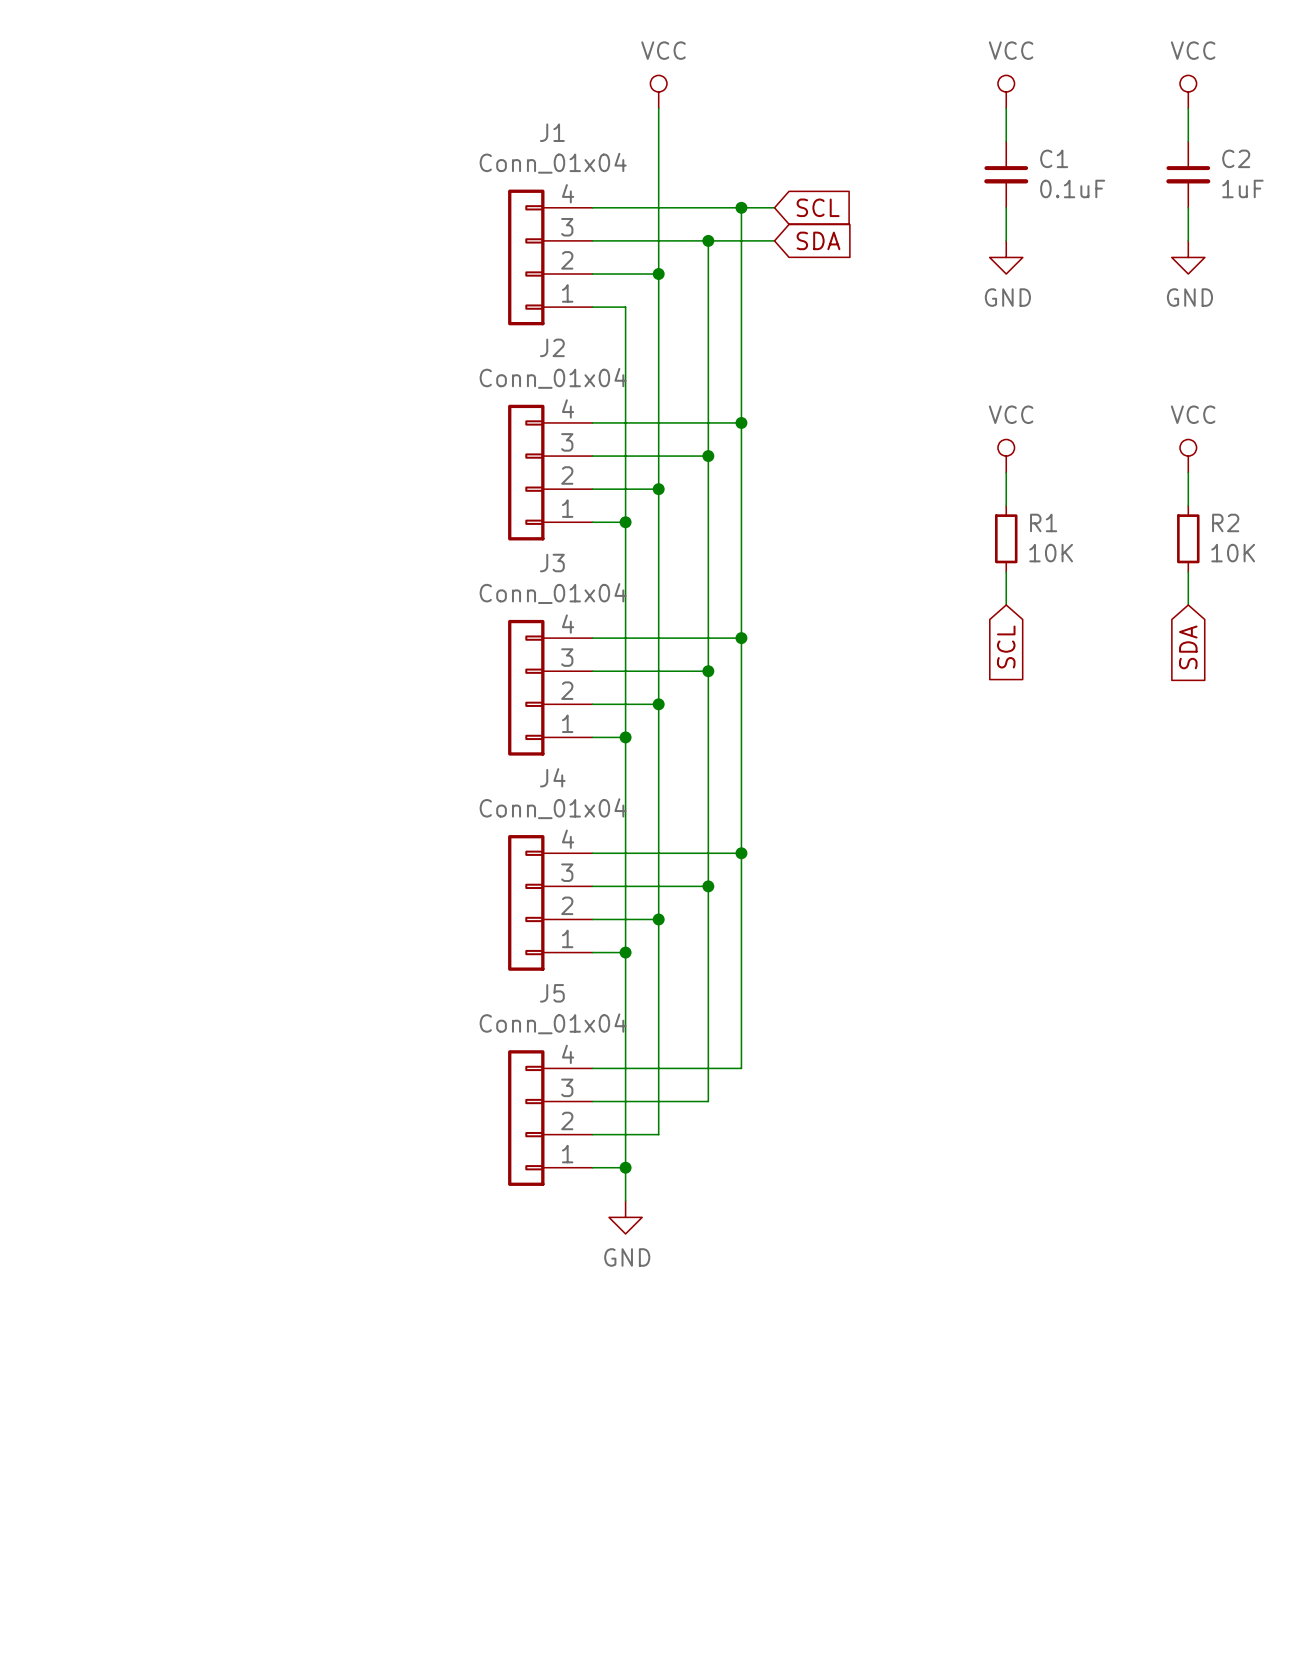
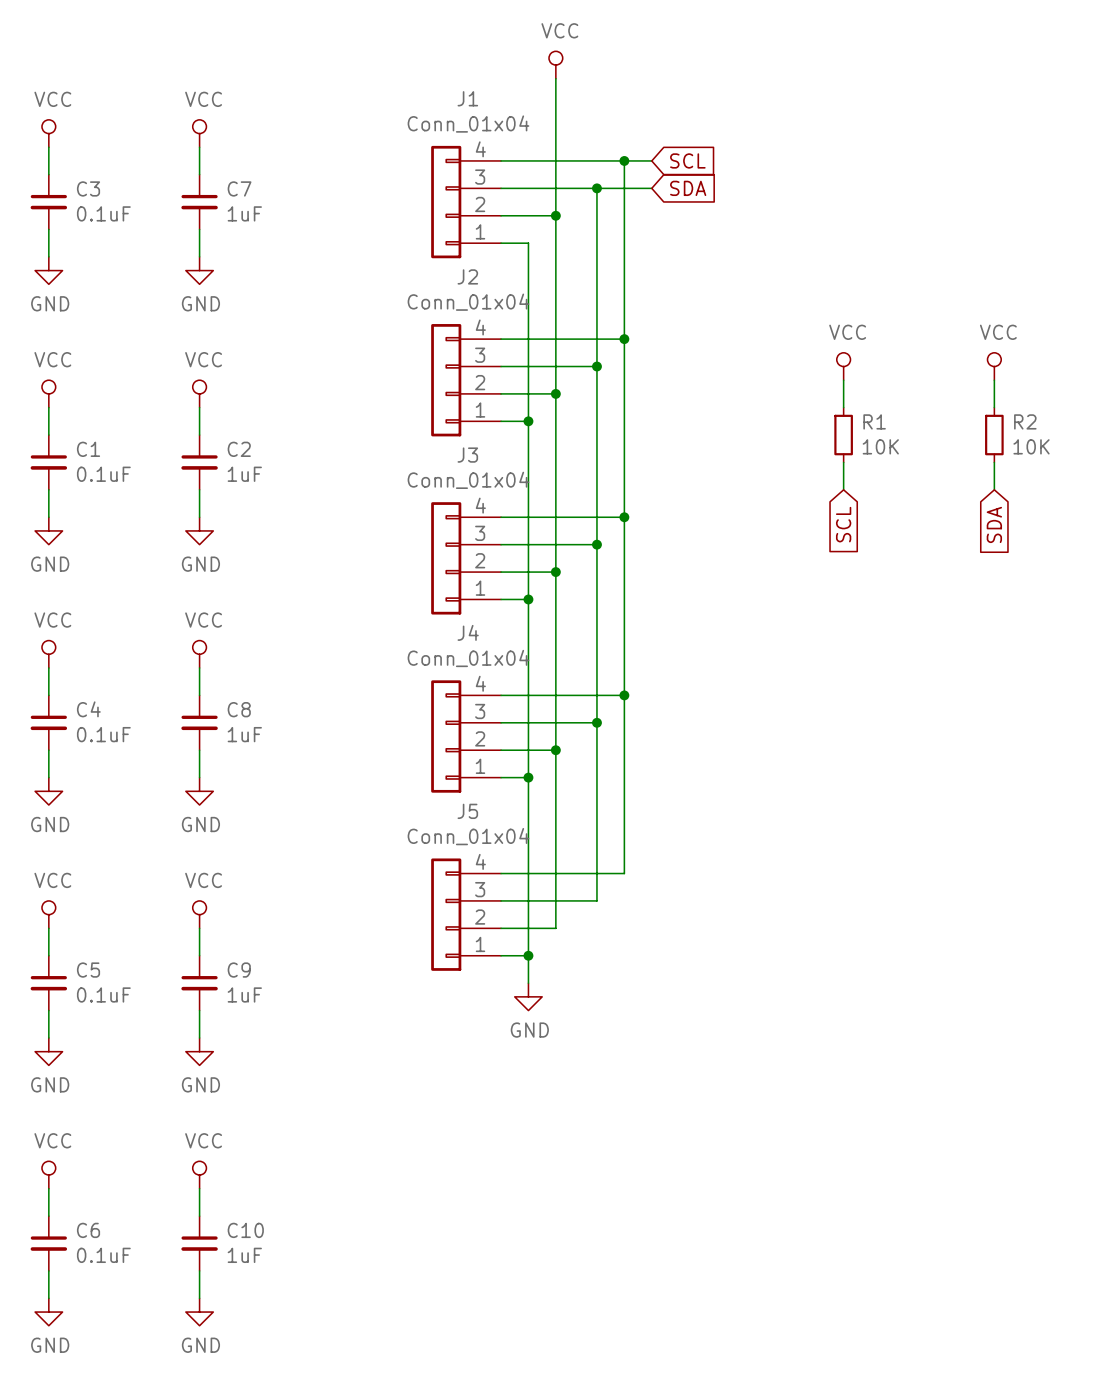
power symbol: VCC (1006, 91) -> none
power symbol: VCC (1188, 91) -> none
wire: (1006, 108) (1006, 141) -> none
wire: (1188, 108) (1188, 141) -> none
power symbol: none -> VCC (48, 133)
power symbol: none -> VCC (199, 133)
C1 position: (1006, 174) -> (48, 462)
C2 position: (1188, 174) -> (199, 462)
wire: none -> (48, 147) (48, 174)
wire: none -> (199, 147) (199, 174)
wire: (1006, 207) (1006, 240) -> none
wire: (1188, 207) (1188, 240) -> none
C3: none -> 0.1uF (48, 202)
C7: none -> 1uF (199, 202)
power symbol: GND (1006, 257) -> none
power symbol: GND (1188, 257) -> none
wire: none -> (48, 229) (48, 256)
wire: none -> (199, 229) (199, 256)
power symbol: none -> GND (48, 270)
power symbol: none -> GND (199, 270)
power symbol: none -> VCC (48, 393)
power symbol: none -> VCC (199, 393)
wire: none -> (48, 407) (48, 435)
wire: none -> (199, 407) (199, 435)
wire: none -> (48, 489) (48, 517)
wire: none -> (199, 489) (199, 517)
power symbol: none -> GND (48, 530)
power symbol: none -> GND (199, 530)
power symbol: none -> VCC (48, 654)
power symbol: none -> VCC (199, 654)
wire: none -> (48, 667) (48, 695)
wire: none -> (199, 667) (199, 695)
C4: none -> 0.1uF (48, 722)
C8: none -> 1uF (199, 722)
wire: none -> (48, 750) (48, 777)
wire: none -> (199, 750) (199, 777)
power symbol: none -> GND (48, 791)
power symbol: none -> GND (199, 791)
power symbol: none -> VCC (48, 914)
power symbol: none -> VCC (199, 914)
wire: none -> (48, 928) (48, 955)
wire: none -> (199, 928) (199, 955)
C5: none -> 0.1uF (48, 983)
C9: none -> 1uF (199, 983)
wire: none -> (48, 1010) (48, 1037)
wire: none -> (199, 1010) (199, 1037)
power symbol: none -> GND (48, 1051)
power symbol: none -> GND (199, 1051)
power symbol: none -> VCC (48, 1175)
power symbol: none -> VCC (199, 1175)
wire: none -> (48, 1188) (48, 1216)
wire: none -> (199, 1188) (199, 1216)
C6: none -> 0.1uF (48, 1243)
C10: none -> 1uF (199, 1243)
wire: none -> (48, 1270) (48, 1298)
wire: none -> (199, 1270) (199, 1298)
power symbol: none -> GND (48, 1312)
power symbol: none -> GND (199, 1312)

